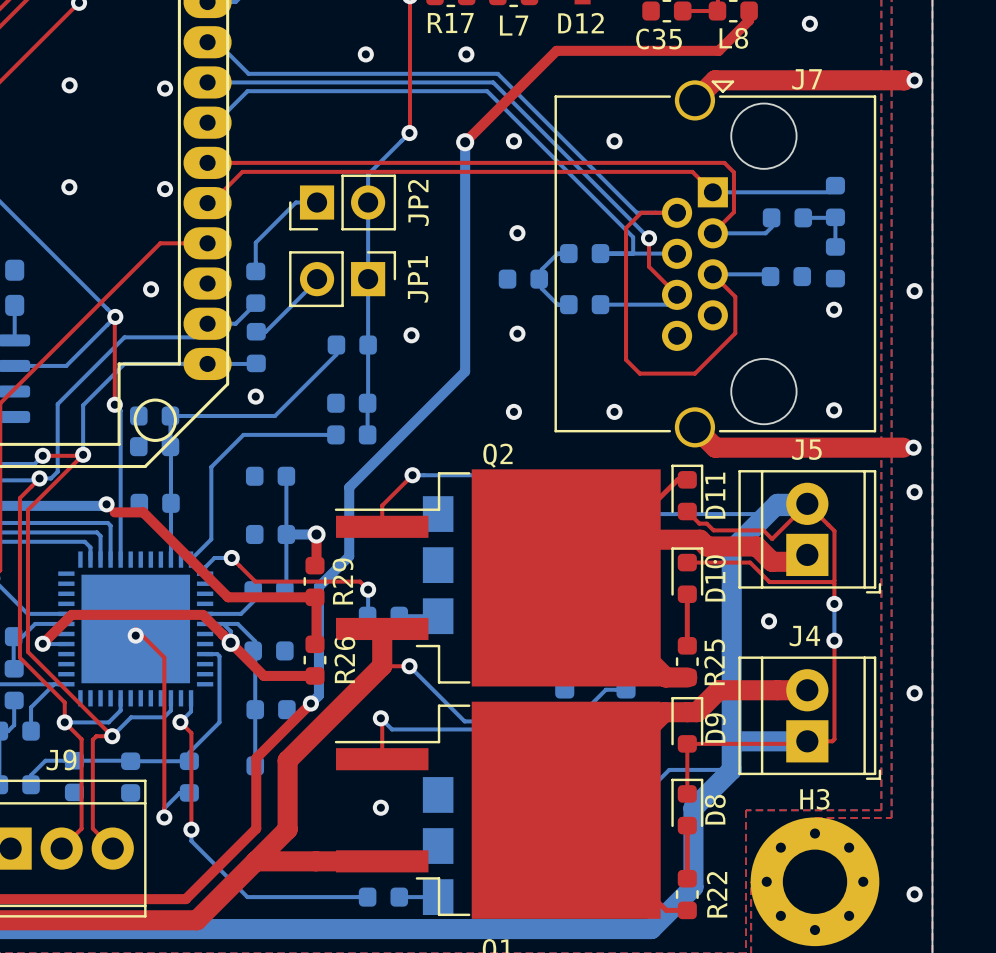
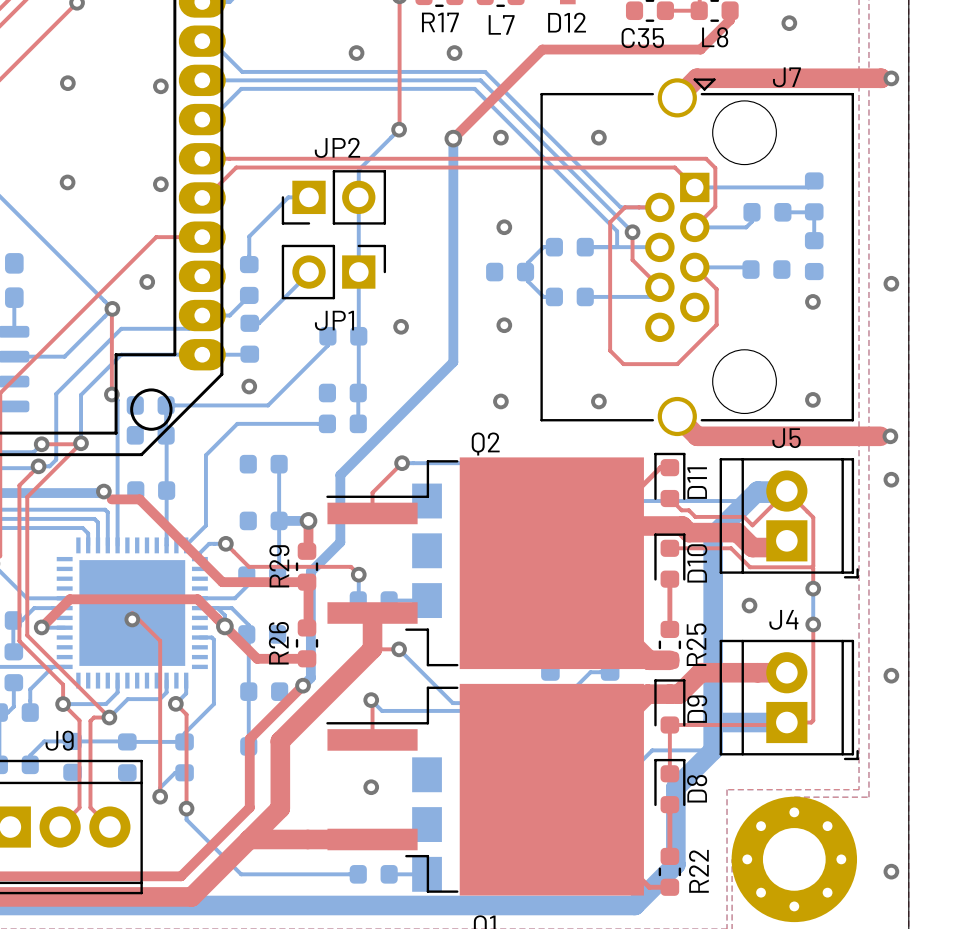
JP2 name rotation: 0° (418, 202) -> 90° clockwise (337, 147)
JP2 name position: JP2 (418, 202) -> JP2 (337, 147)
JP1 name rotation: 0° (418, 279) -> 90° clockwise (334, 320)
JP1 name position: JP1 (418, 279) -> JP1 (334, 320)
R29 name position: R29 (343, 581) -> R29 (279, 566)
R26 name position: R26 (344, 660) -> R26 (278, 643)
H3 name: H3 (814, 799) -> none

